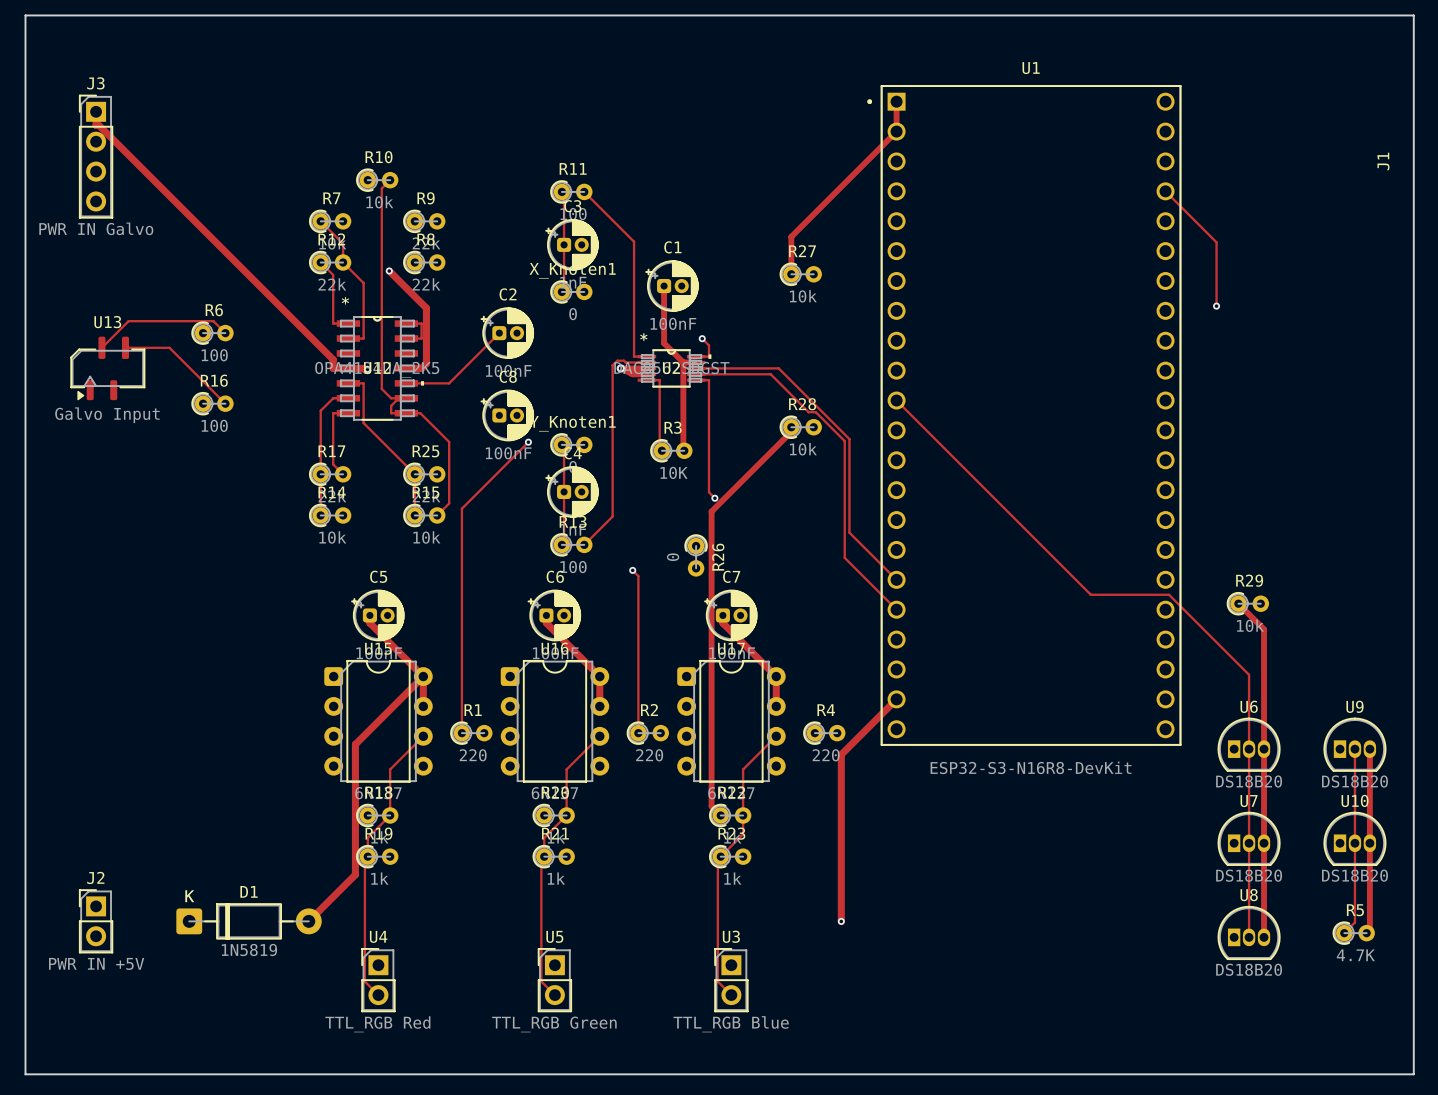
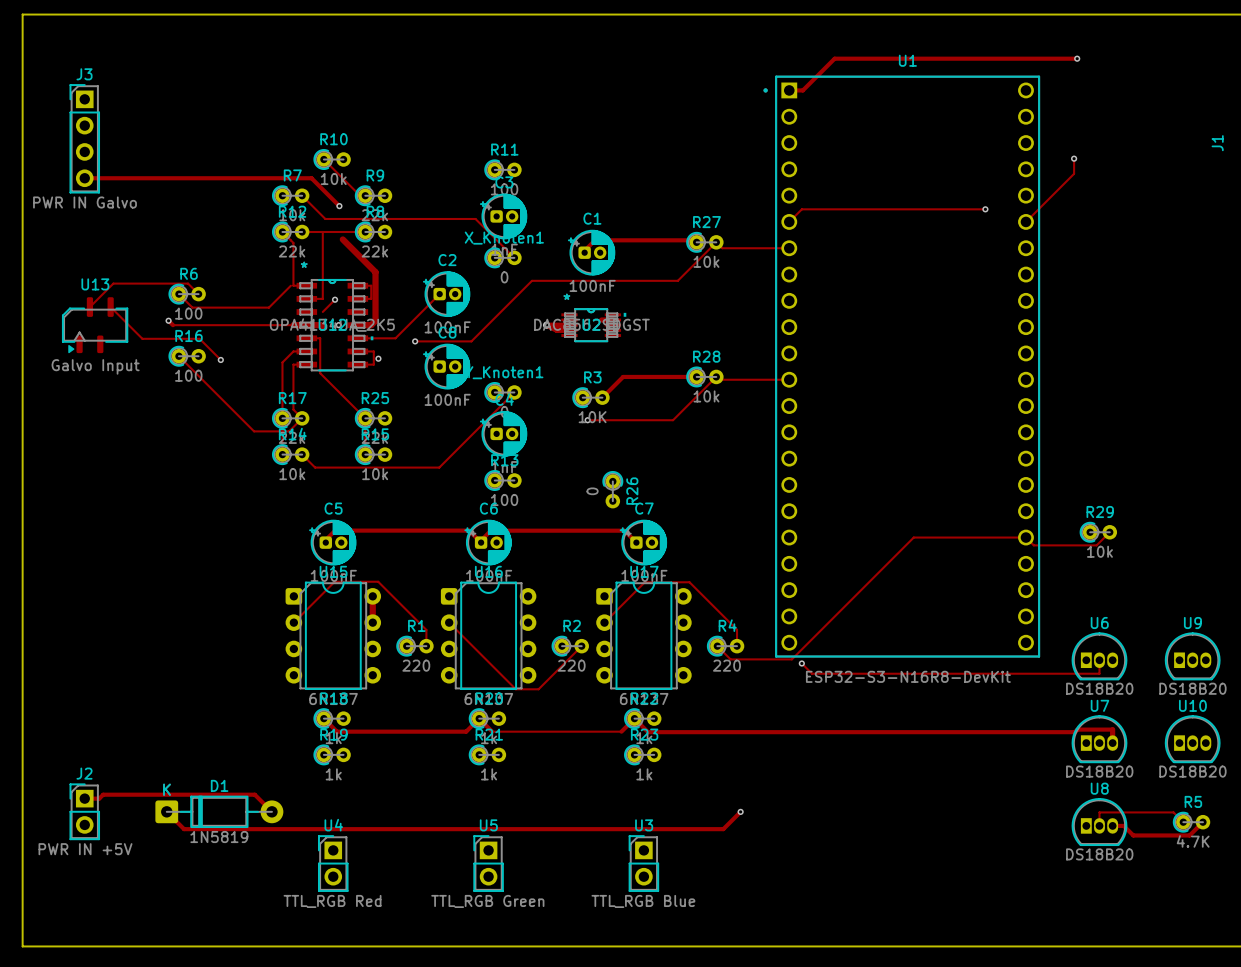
track: none -> (1077, 58) (834, 58) (802, 90) (789, 90)
via: none -> (1077, 58)
track: (896, 101) (896, 131) (791, 236) (791, 274) -> (584, 252) (595, 240) (694, 240) (696, 242)
track: (96, 111) (96, 125) (98, 125) (333, 359) (333, 368) -> (168, 320) (172, 325) (293, 325)
track: none -> (1074, 158) (1074, 173) (1025, 221)
via: none -> (1074, 158)
track: none -> (323, 159) (360, 195) (365, 195)
track: (390, 180) (381, 188) (381, 388) (391, 398) (406, 398) -> none
track: (561, 191) (564, 194) (564, 289) (561, 291) -> none
track: (584, 191) (634, 241) (634, 356) (646, 356) -> none
track: (1165, 191) (1216, 242) (1216, 306) -> none
track: none -> (84, 178) (311, 178) (339, 206)
track: (320, 221) (343, 243) (343, 262) (363, 283) (363, 338) -> (322, 231) (322, 298) (320, 298)
track: none -> (302, 195) (325, 218) (475, 218) (514, 257)
via: none -> (339, 206)
track: none -> (985, 209) (801, 209) (789, 221)
via: none -> (985, 209)
track: none -> (302, 231) (365, 231)
via: (389, 271) -> none
track: none -> (789, 248) (722, 248) (716, 242) (677, 280) (531, 280) (471, 341) (415, 341)
track: (664, 286) (664, 343) (683, 362) (684, 450) -> (696, 376) (623, 376) (602, 397)
via: (1216, 306) -> none
track: none -> (290, 285) (268, 307) (192, 307) (178, 294)
track: (702, 338) (708, 345) (708, 356) (696, 356) -> none
via: (702, 338) -> none
track: none -> (335, 299) (322, 311)
via: none -> (335, 299)
track: (125, 347) (169, 347) (225, 403) -> (110, 307) (142, 338) (199, 338) (220, 359)
track: (646, 362) (617, 360) (612, 365) (612, 516) (584, 544) -> none
via: none -> (168, 320)
via: none -> (338, 325)
track: (696, 368) (778, 368) (849, 439) (849, 532) (896, 579) -> none
via: (367, 369) -> none
track: (696, 374) (770, 374) (808, 412) (815, 412) (844, 441) (844, 557) (896, 609) -> none
track: (646, 380) (659, 380) (659, 448) (661, 450) -> none
track: (696, 380) (708, 380) (708, 492) (714, 498) -> none
via: none -> (415, 341)
track: (398, 398) (391, 405) (391, 413) (406, 413) -> none
track: (896, 400) (1090, 594) (1169, 594) (1249, 674) (1249, 749) -> none
track: none -> (178, 356) (254, 431) (289, 431) (302, 418)
via: none -> (378, 358)
via: none -> (220, 359)
track: (420, 413) (449, 442) (449, 503) (437, 515) -> (370, 364) (373, 364) (373, 351) (357, 351)
track: (791, 427) (791, 431) (711, 511) (711, 806) (720, 815) -> none
track: none -> (789, 379) (719, 379) (716, 376) (673, 420) (587, 420)
track: (528, 442) (461, 508) (461, 733) -> none
via: (528, 442) -> none
track: (561, 444) (564, 447) (564, 542) (561, 544) -> none
track: none -> (514, 392) (439, 467) (315, 467) (302, 454)
via: none -> (587, 420)
via: (714, 498) -> none
track: (632, 570) (638, 576) (638, 733) -> none
via: (632, 570) -> none
track: (1238, 603) (1264, 629) (1264, 827) -> (323, 718) (336, 731) (466, 731) (479, 718) (492, 731) (621, 731) (634, 718) (648, 732) (1074, 732) (1077, 729) (1112, 729)
track: none -> (1109, 532) (1096, 545) (1033, 545) (1025, 537) (913, 537) (791, 659) (730, 659) (717, 646)
track: (369, 615) (369, 623) (423, 676) (355, 744) (355, 874) (308, 921) -> (84, 798) (99, 798) (103, 794) (254, 794) (271, 811)
track: (546, 615) (546, 623) (599, 676) (599, 706) -> (481, 542) (469, 530) (335, 530) (325, 539) (325, 542)
track: (722, 615) (722, 623) (776, 676) (776, 706) -> (636, 542) (624, 530) (490, 530) (480, 541)
track: (896, 699) (841, 754) (841, 921) -> (166, 811) (184, 829) (723, 829) (740, 811)
track: none -> (293, 622) (334, 581) (378, 581) (426, 629) (426, 646)
track: none -> (449, 622) (515, 689) (538, 689) (581, 646)
track: none -> (604, 622) (644, 582) (689, 582) (737, 629) (737, 646)
track: (423, 736) (390, 769) (390, 815) (367, 837) (367, 856) (364, 859) (364, 981) (378, 995) -> none
track: (599, 736) (566, 769) (566, 815) (544, 837) (544, 856) (541, 859) (541, 981) (554, 995) -> none
track: (776, 736) (743, 769) (743, 834) (717, 859) (717, 981) (731, 995) -> none
track: (1354, 749) (1354, 922) (1344, 933) -> none
track: (1369, 749) (1369, 929) (1366, 933) -> none
track: none -> (801, 663) (812, 673) (1099, 673)
via: none -> (801, 663)
track: (1249, 764) (1249, 922) -> (1183, 822) (1173, 812) (1099, 812)
track: (1264, 843) (1264, 937) -> (1202, 822) (1189, 835) (1133, 835) (1123, 825) (1112, 825)

